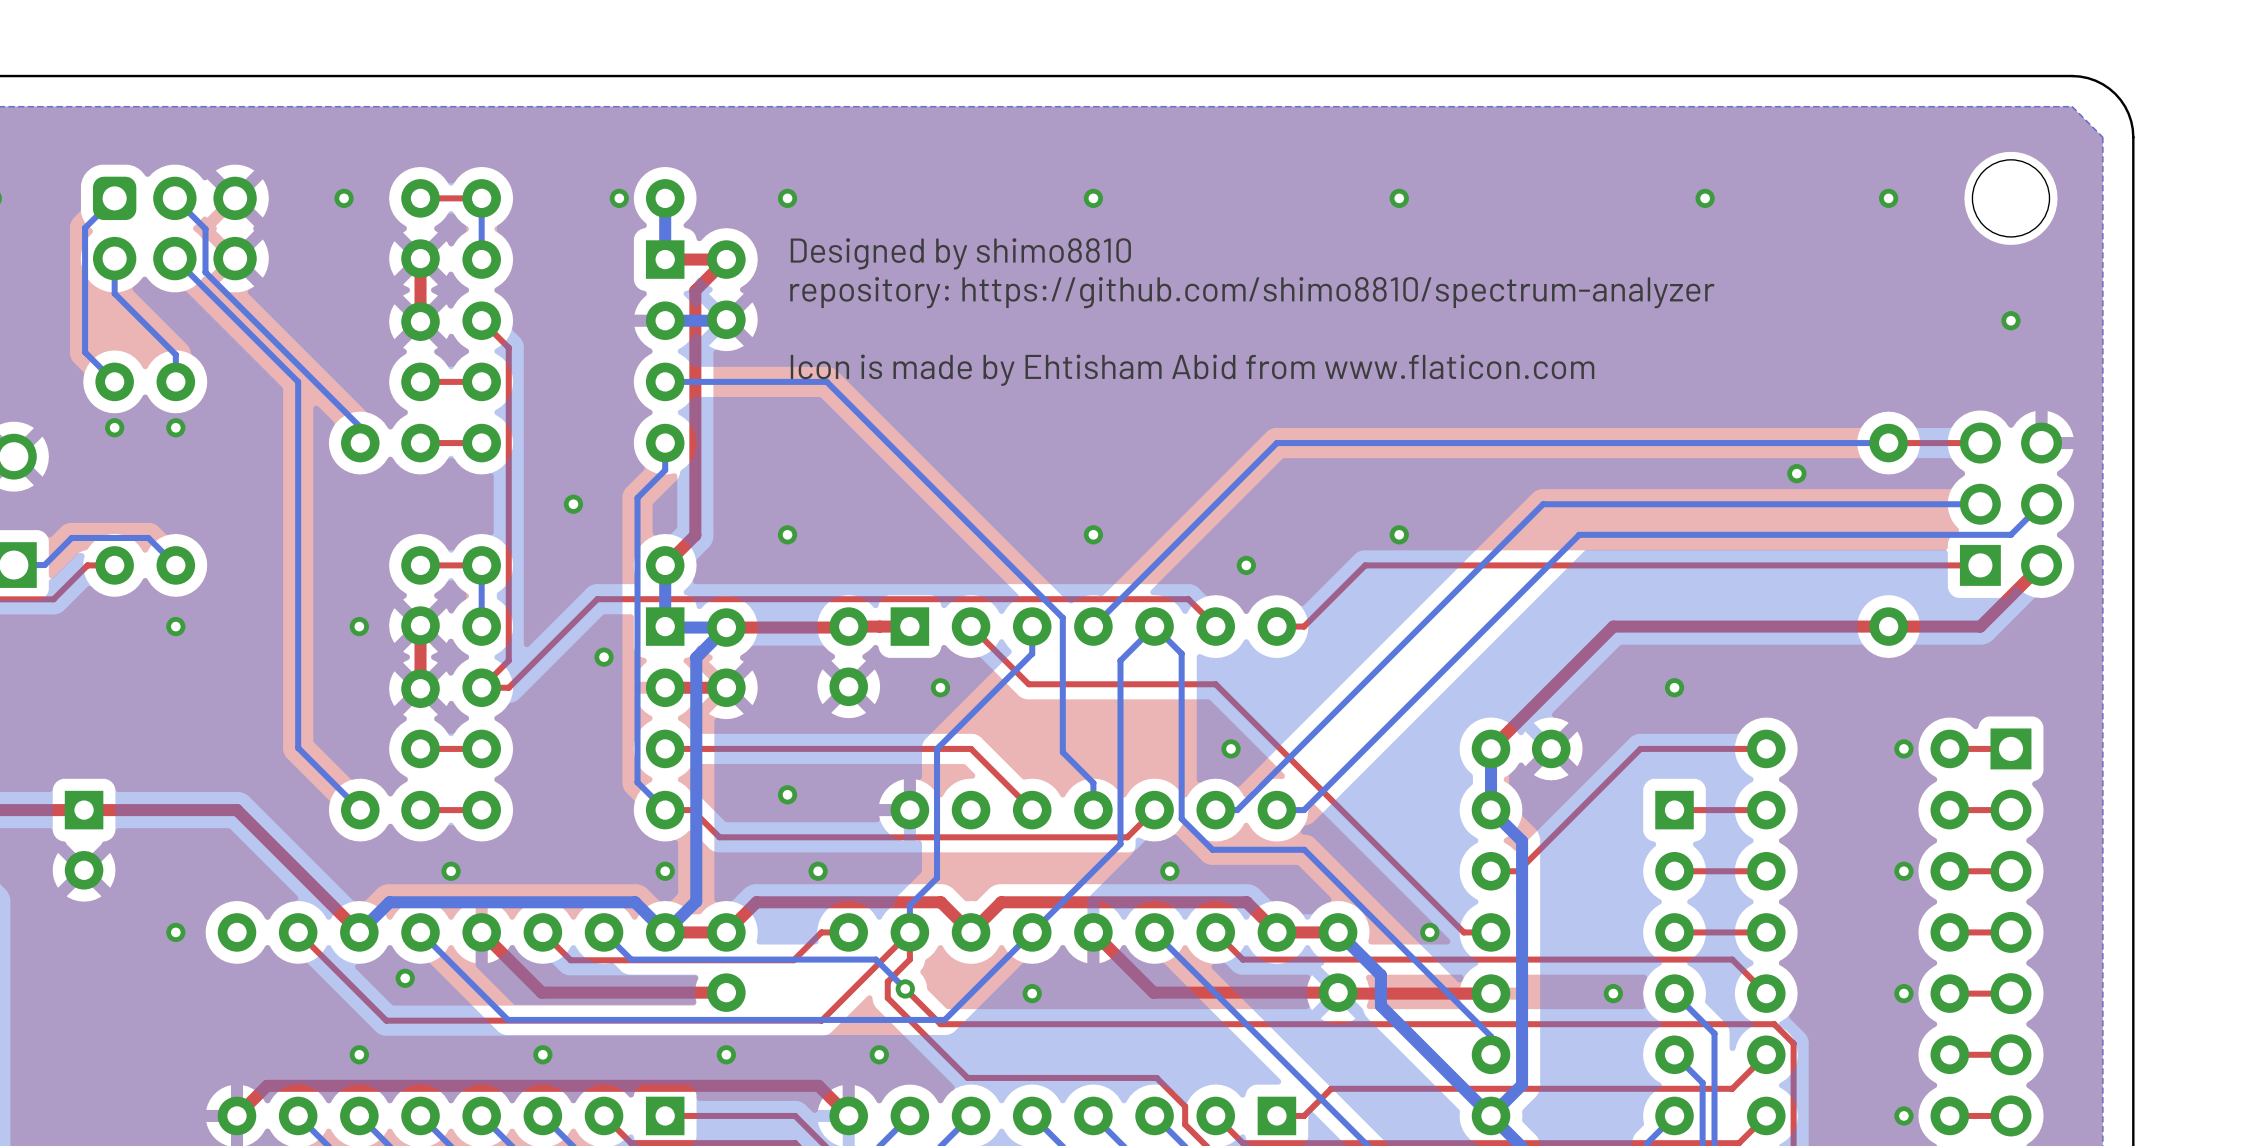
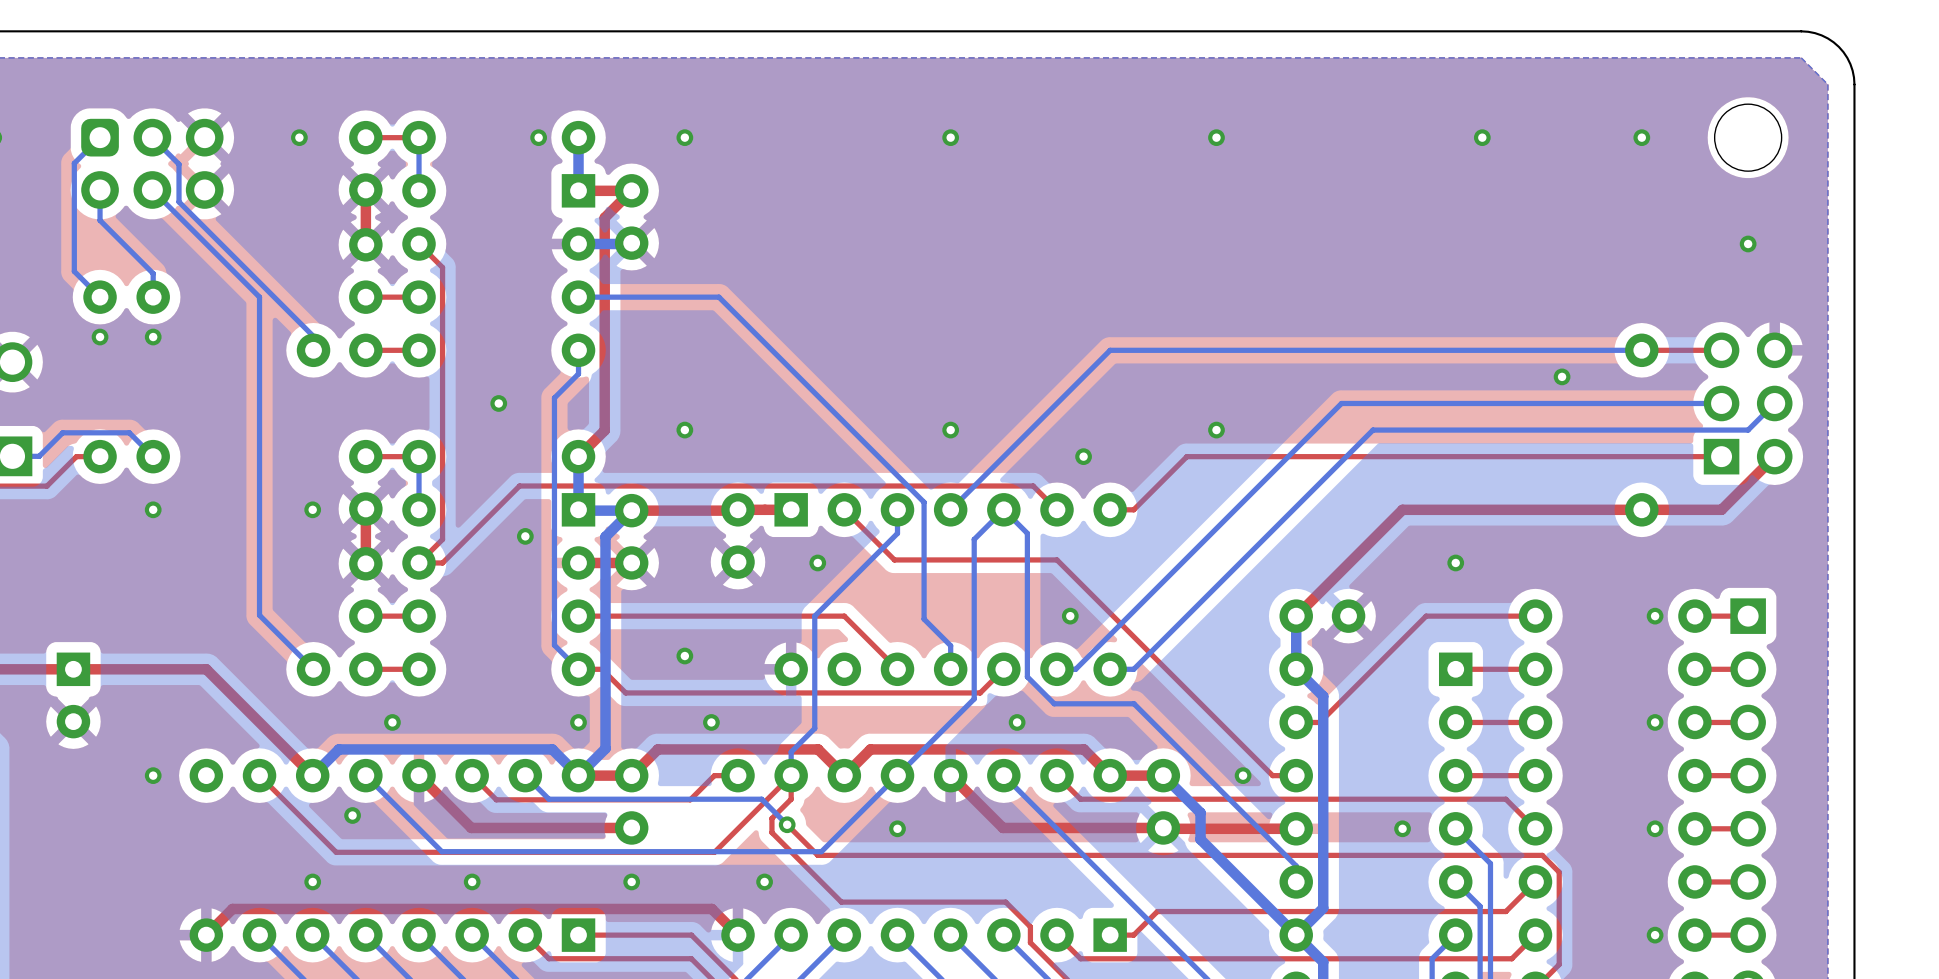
text: Designed by shimo8810 (960, 253) -> none
text: repository: https://github.com/shimo8810/spectrum-analyzer (1252, 292) -> none
text: Icon is made by Ehtisham Abid from www.flaticon.com (1192, 370) -> none

